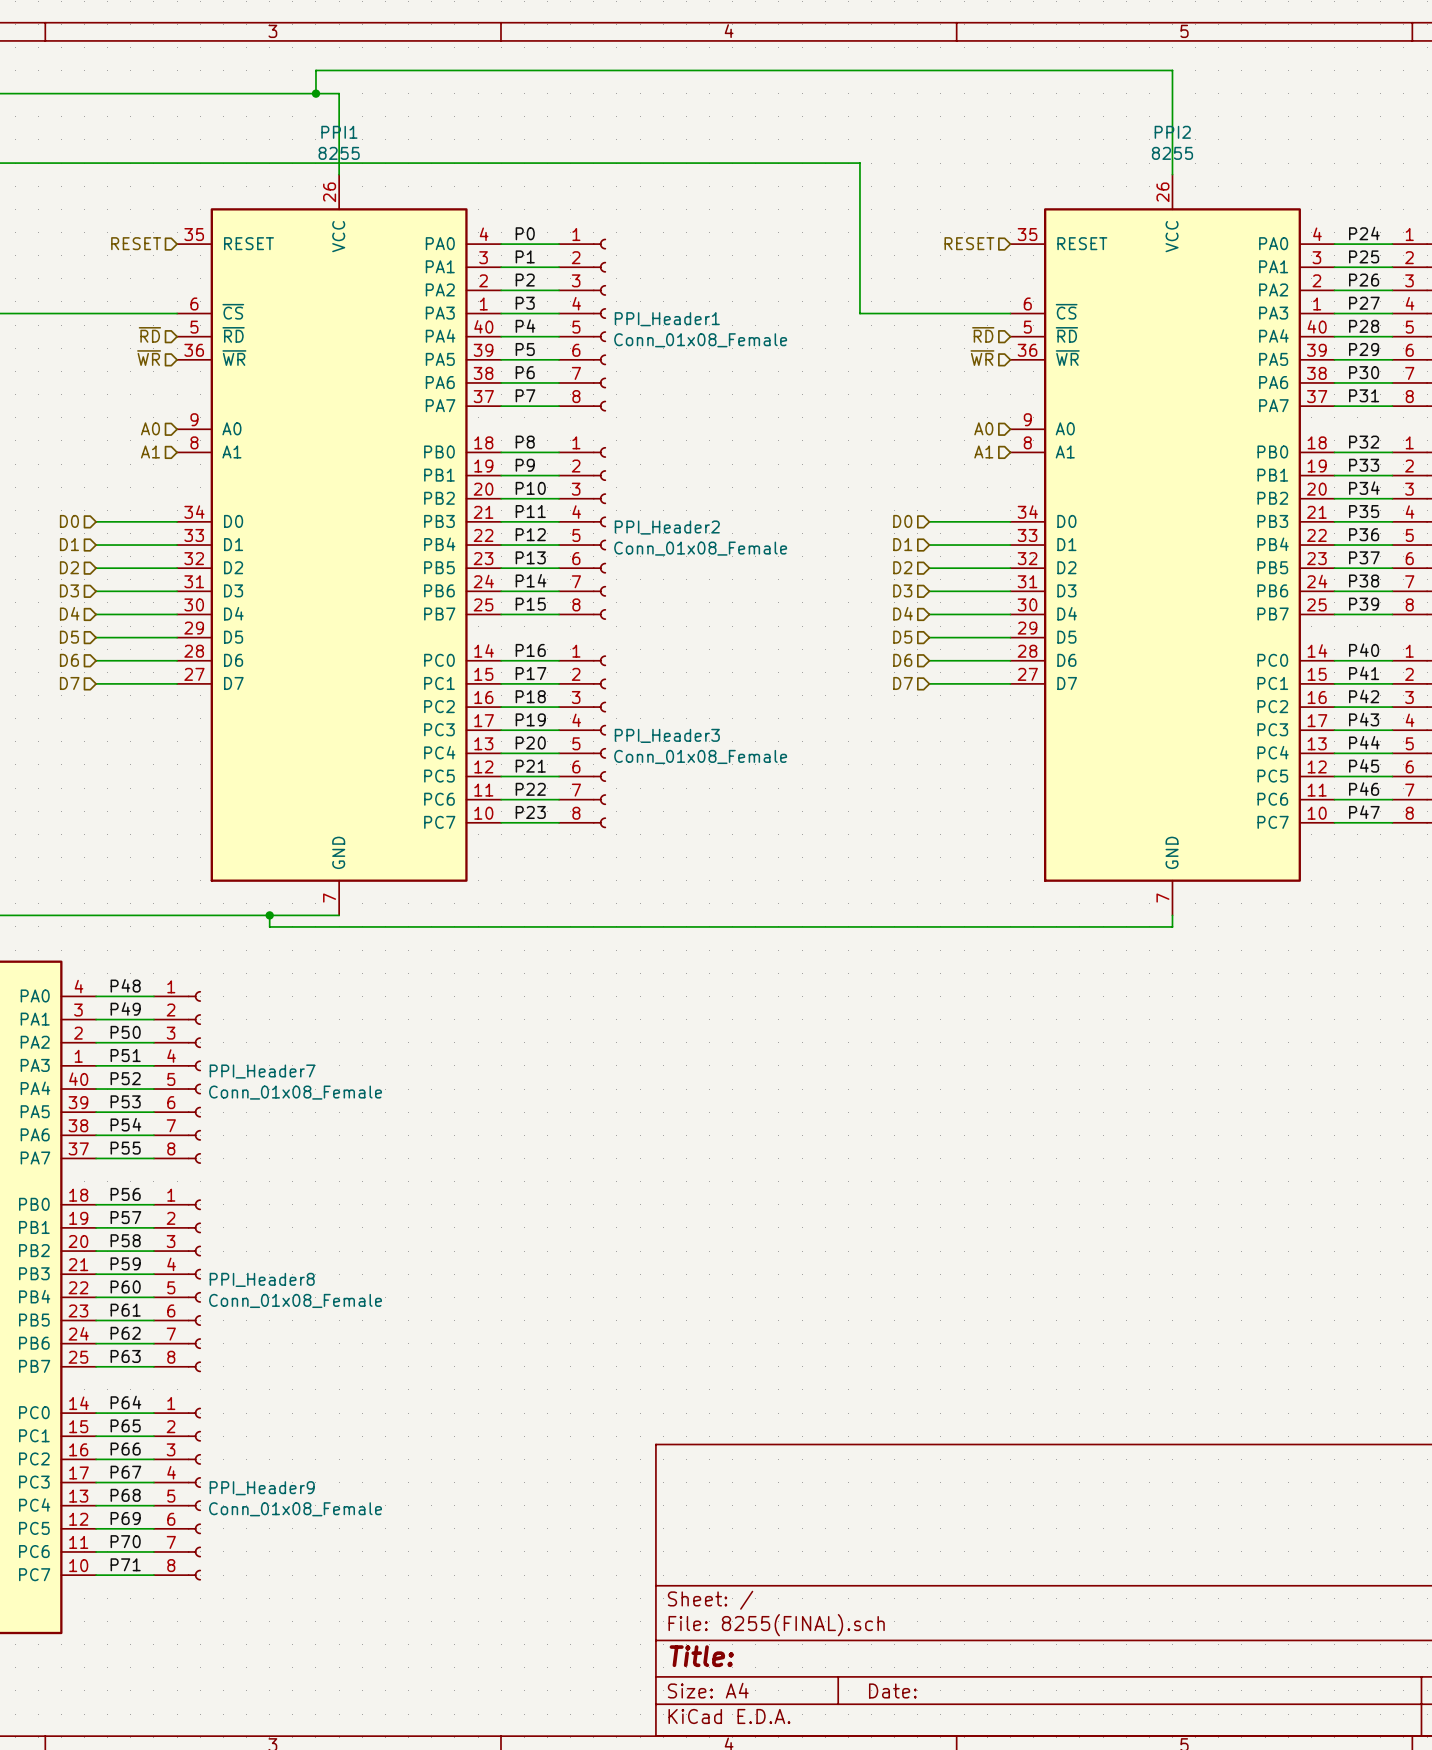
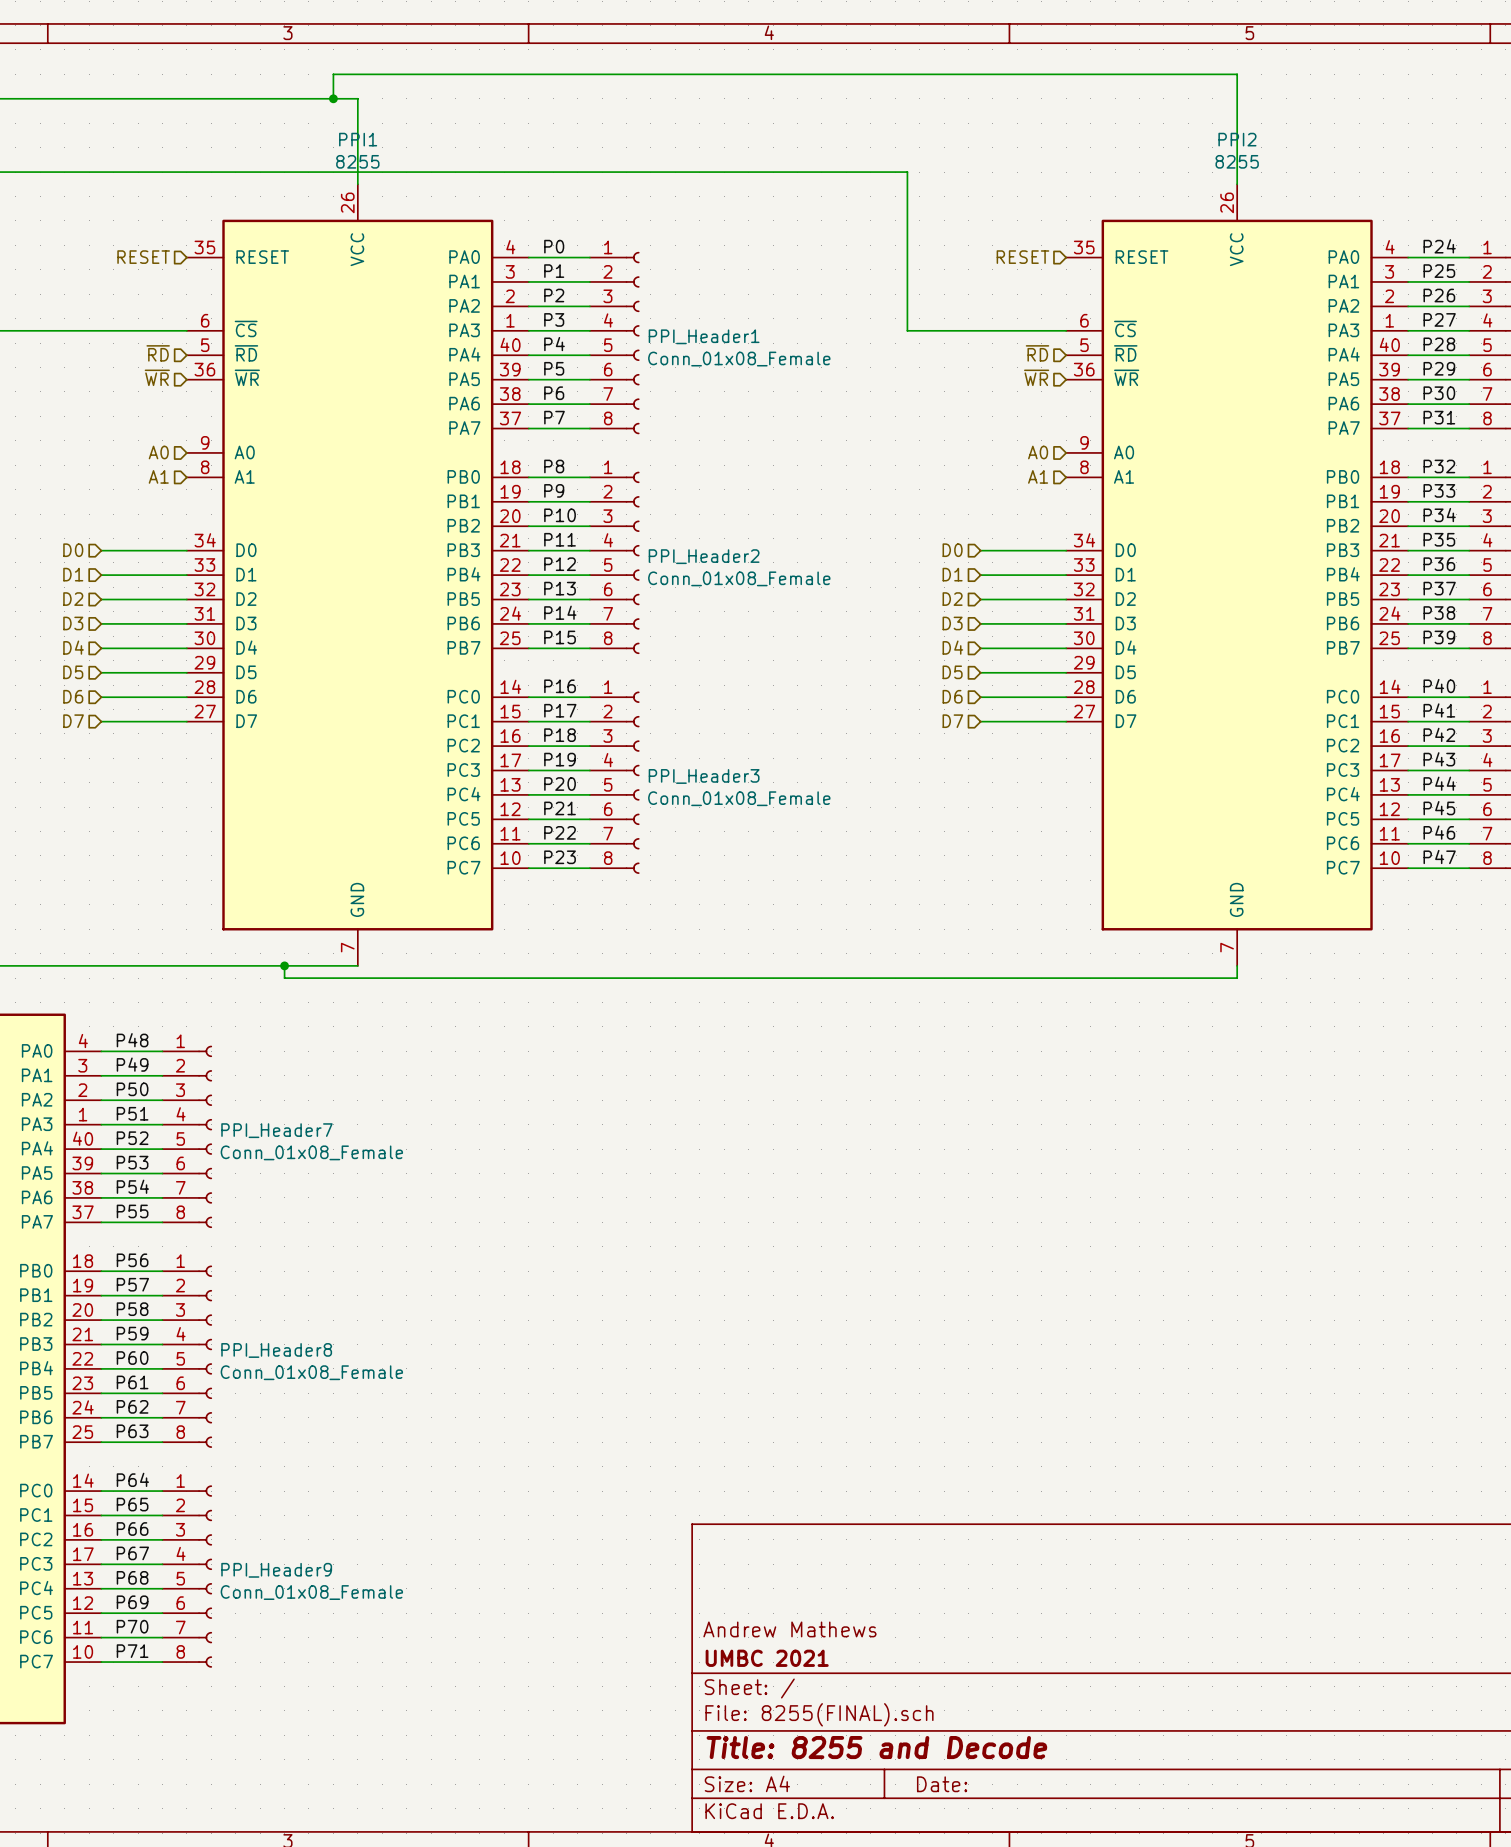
title block: none -> Andrew Mathews (789, 1629)
title block: none -> UMBC 2021 (767, 1658)
title block: Title: (701, 1656) -> Title: 8255 and Decode (876, 1747)

